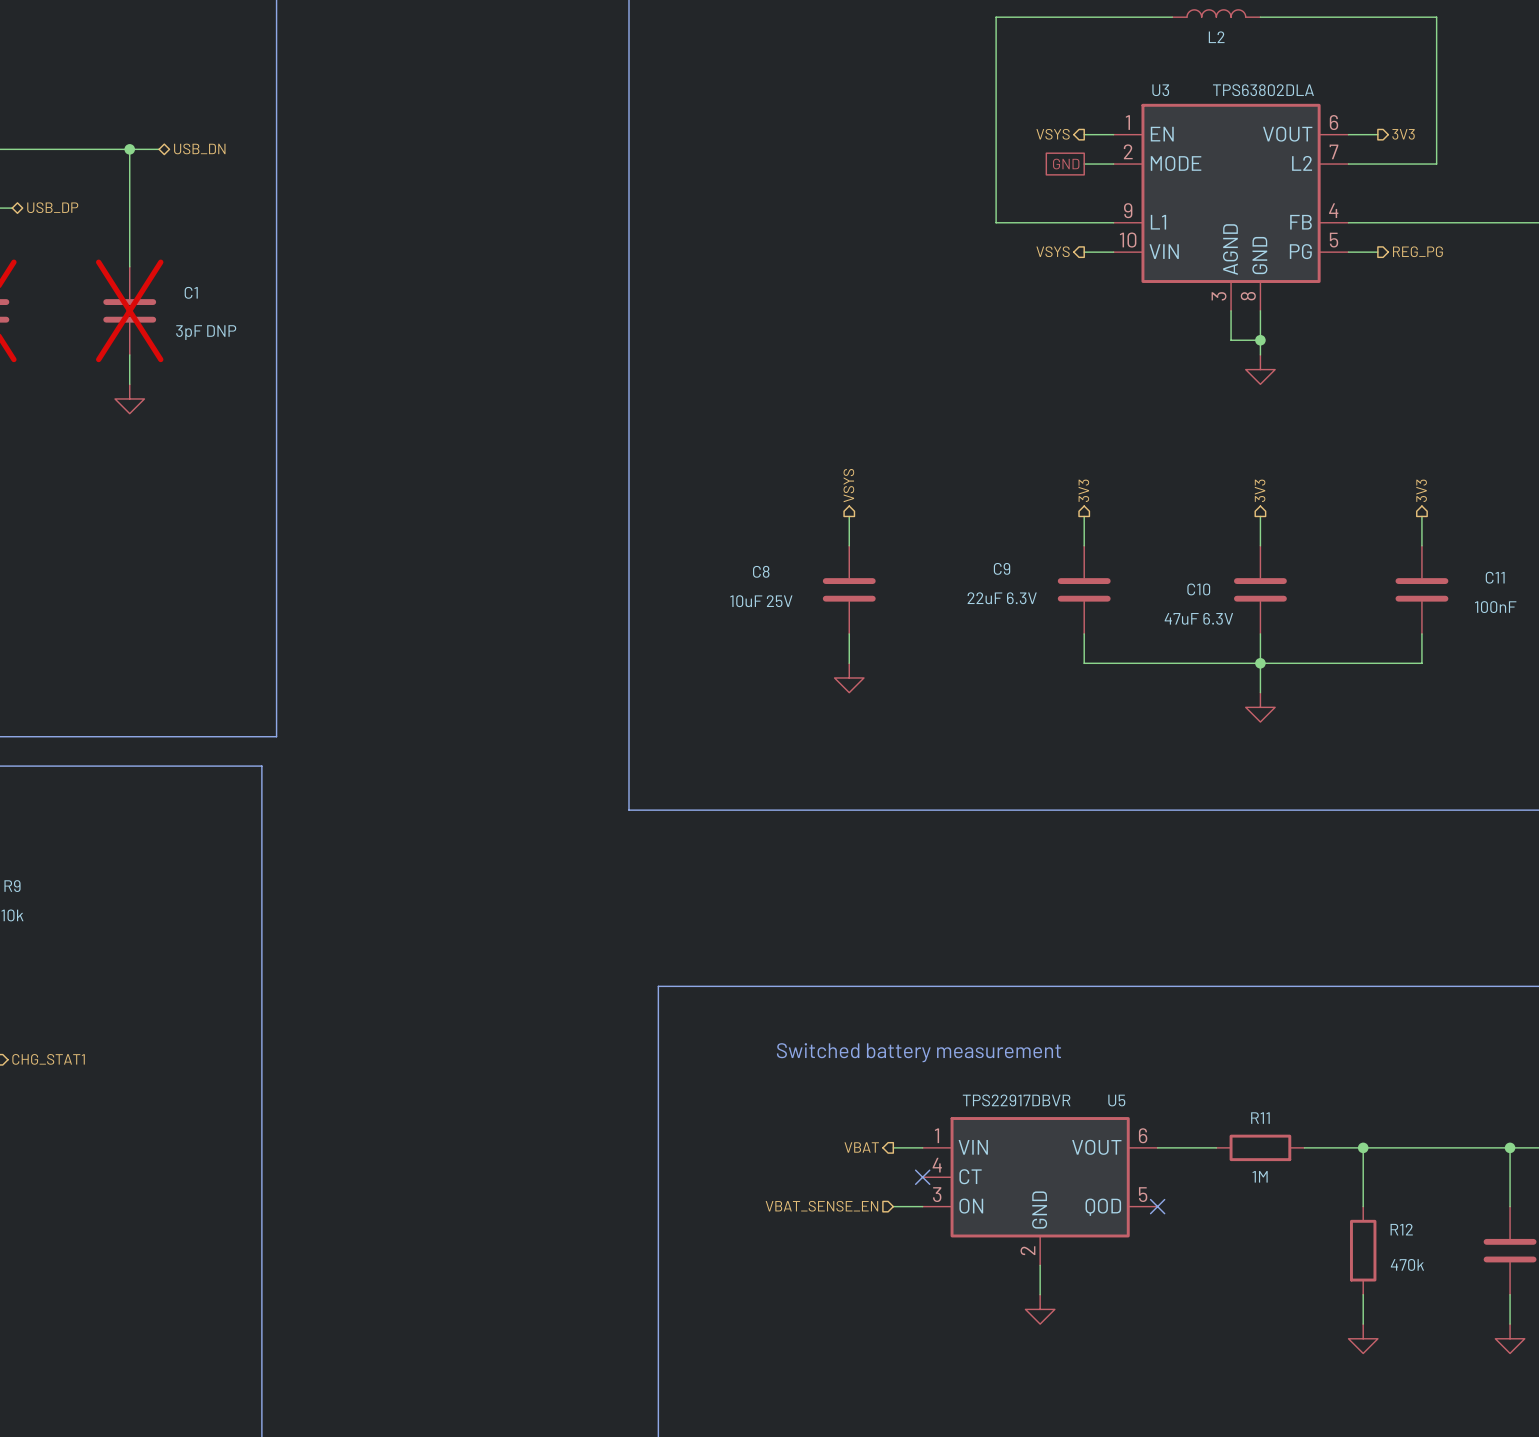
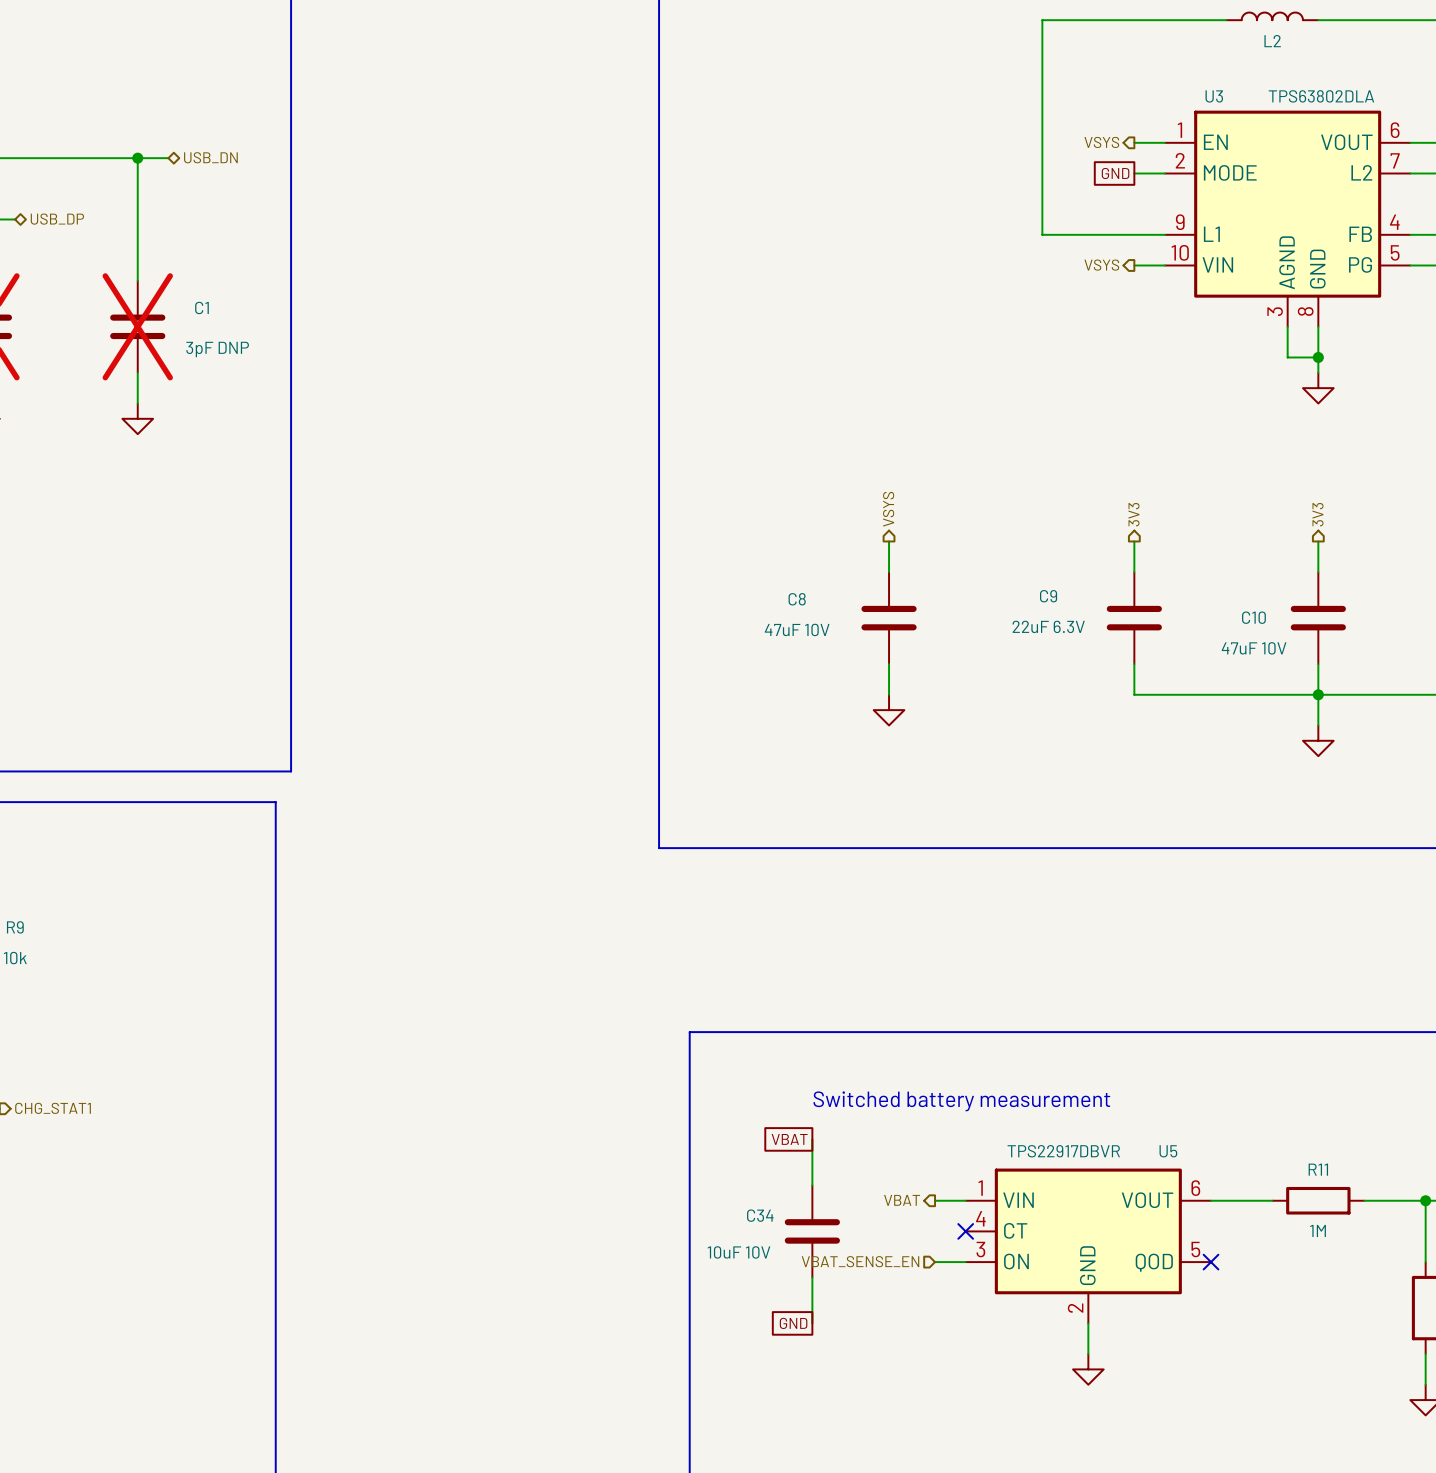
C8 value: 10uF 25V (761, 601) -> 47uF 10V (797, 629)
C10 value: 47uF 6.3V (1198, 618) -> 47uF 10V (1254, 648)
global label: none -> VBAT (789, 1139)
wire: none -> (812, 1139) (812, 1185)
C34: none -> 10uF 10V (812, 1231)
wire: none -> (812, 1277) (812, 1323)
global label: none -> GND (793, 1323)

